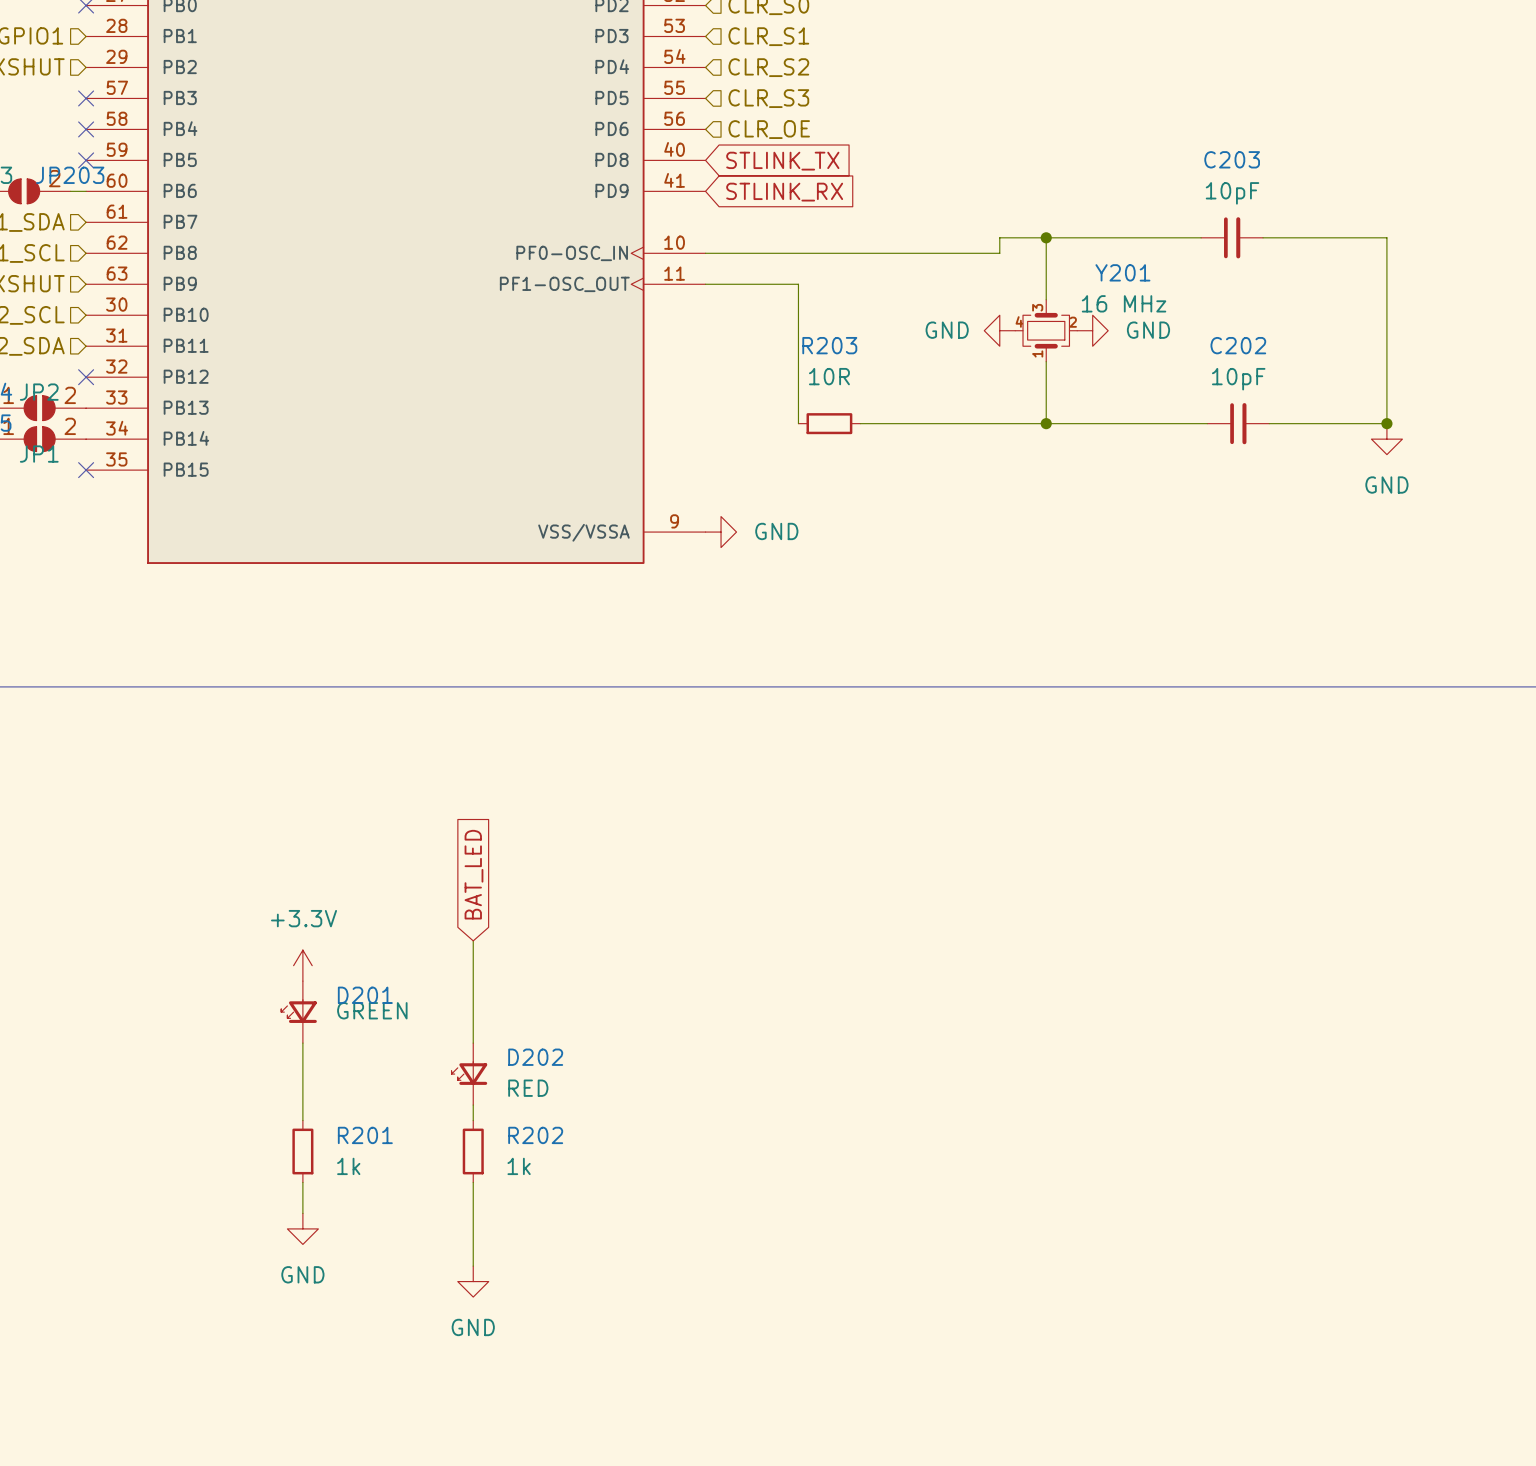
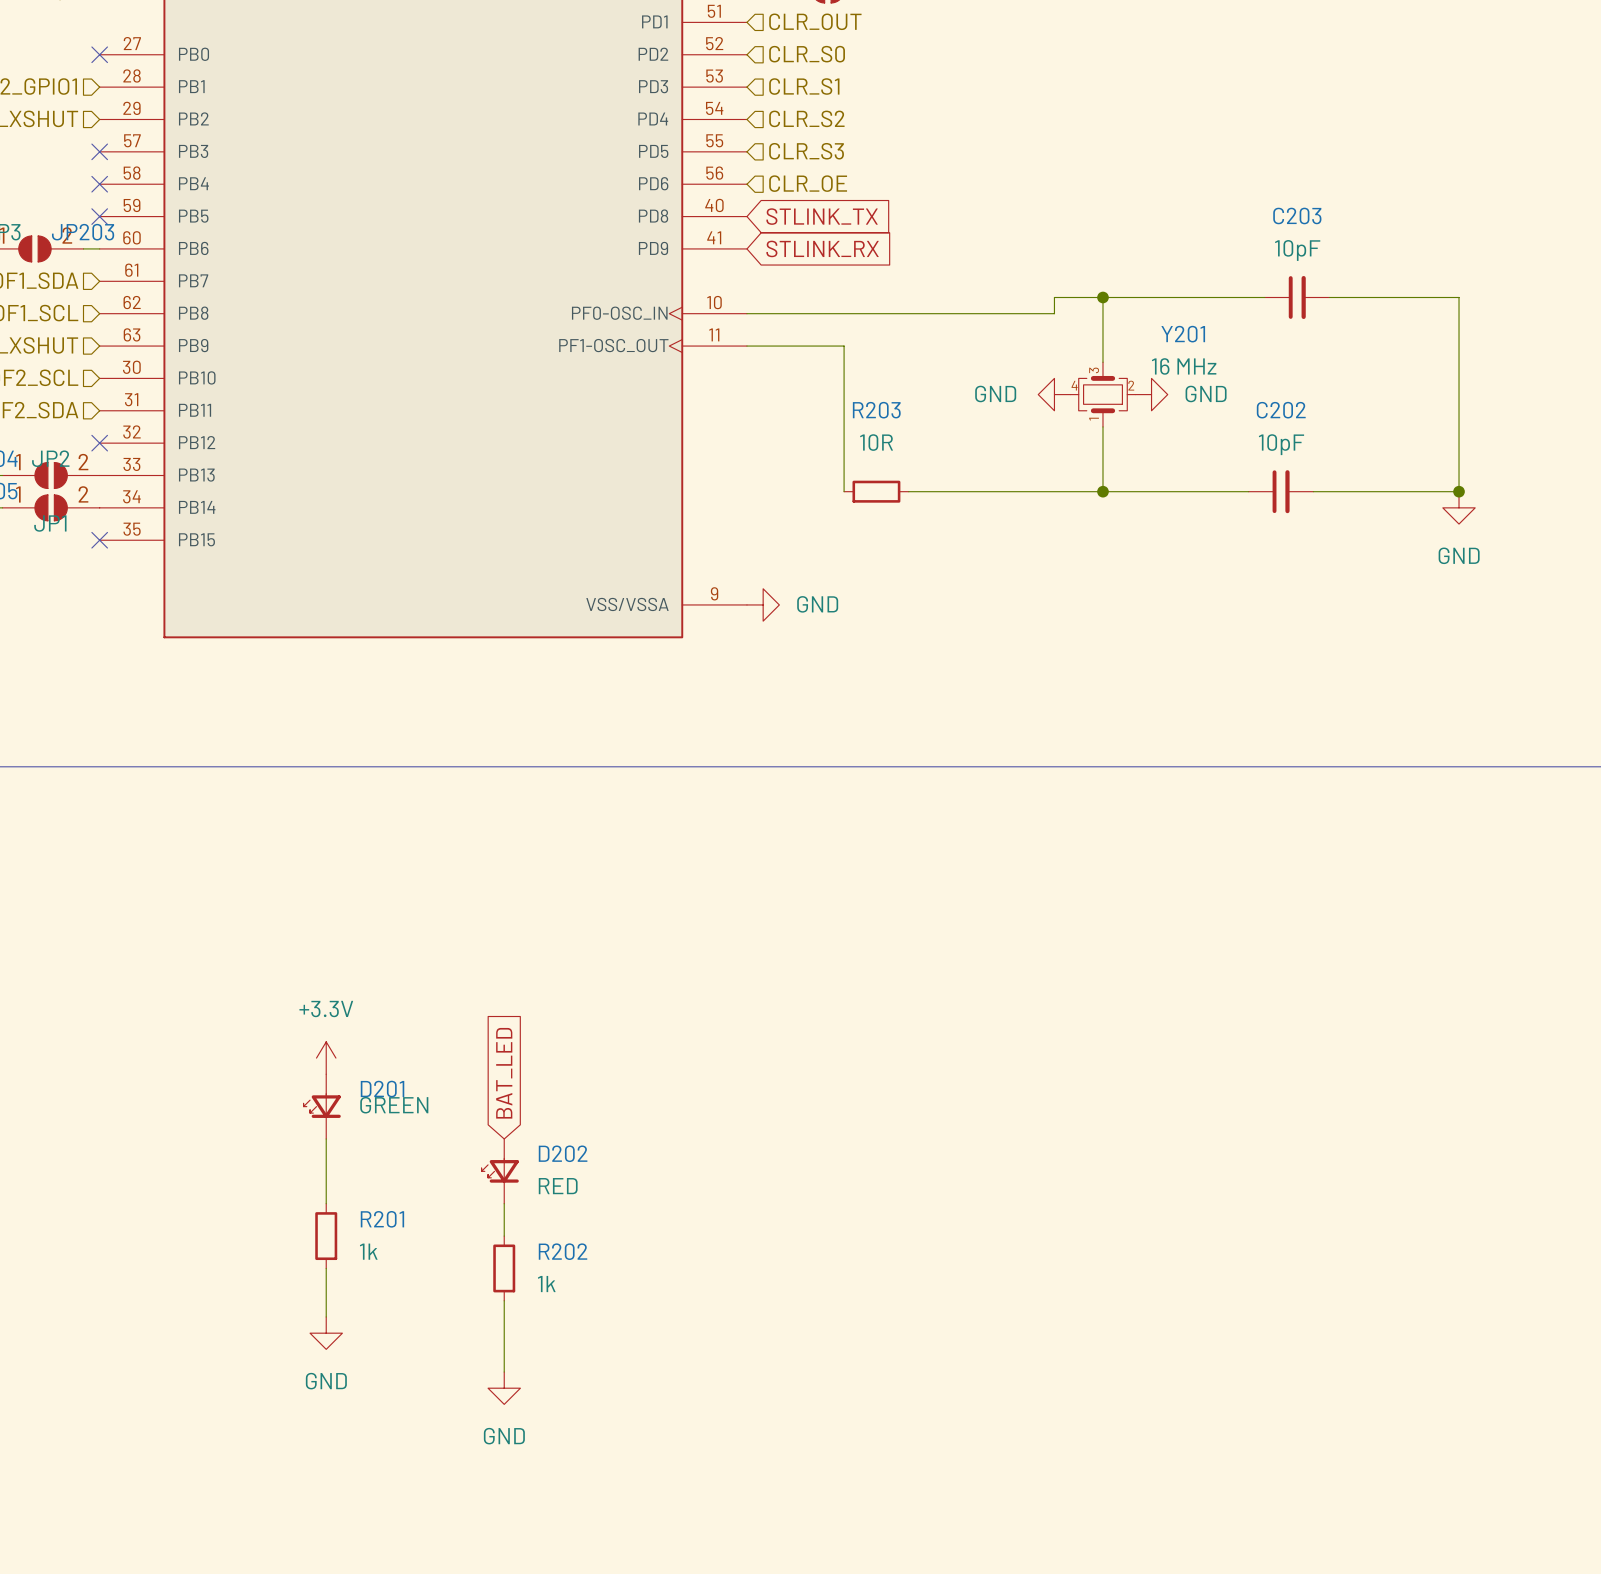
C202 position: (1238, 423) -> (1281, 491)
global label position: BAT_LED (473, 874) -> BAT_LED (504, 1073)
wire: (473, 940) (473, 1043) -> none
R201 position: (302, 1151) -> (326, 1236)
R202 position: (473, 1151) -> (504, 1268)

